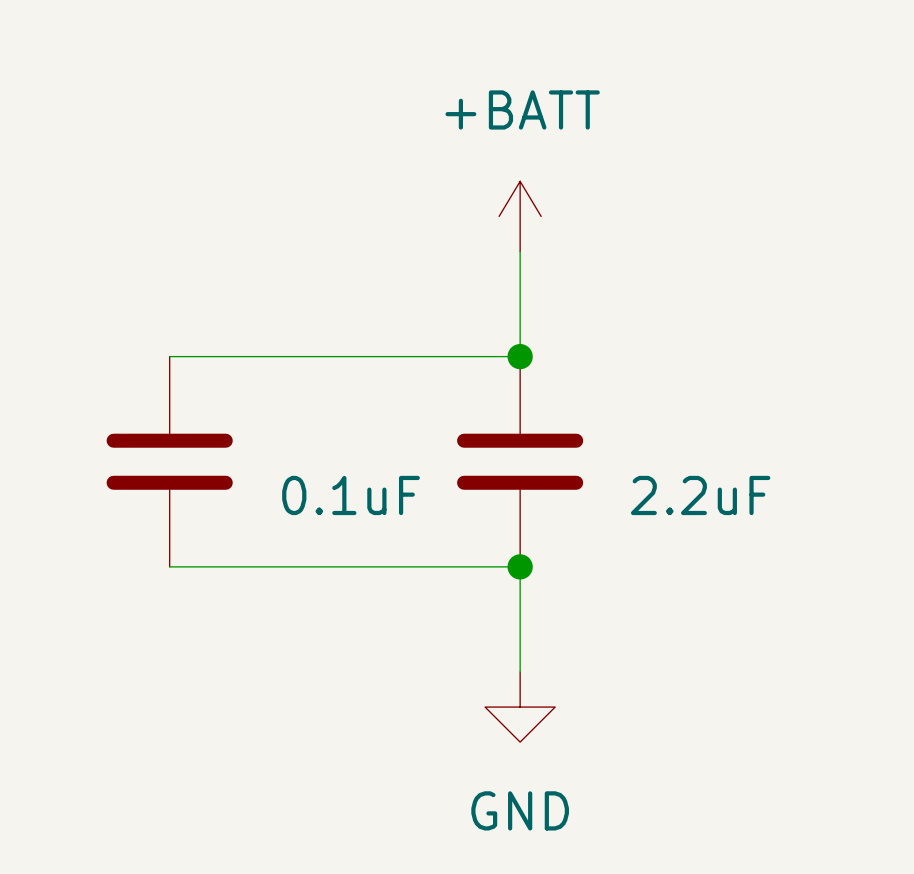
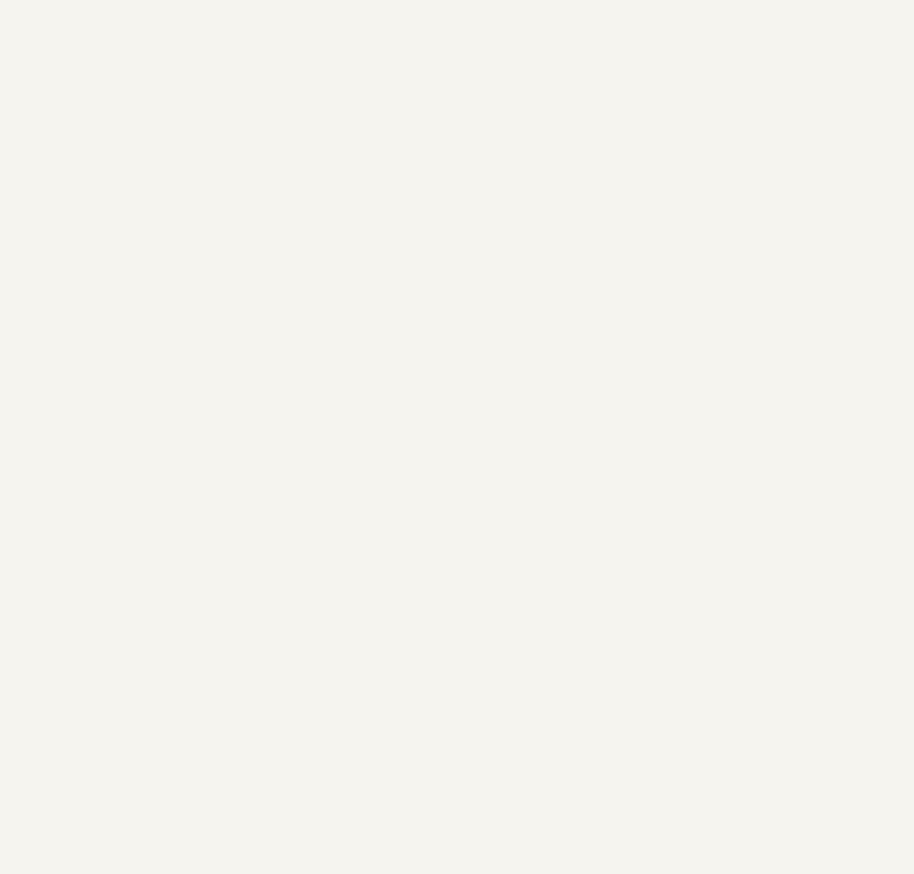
power symbol: +BATT (520, 216) -> none
wire: (520, 251) (520, 356) (169, 356) -> none
junction: (520, 356) -> none
part: 0.1uF (169, 461) -> none
part: 2.2uF (520, 461) -> none
wire: (169, 566) (520, 566) (520, 672) -> none
junction: (520, 566) -> none
power symbol: GND (520, 707) -> none

